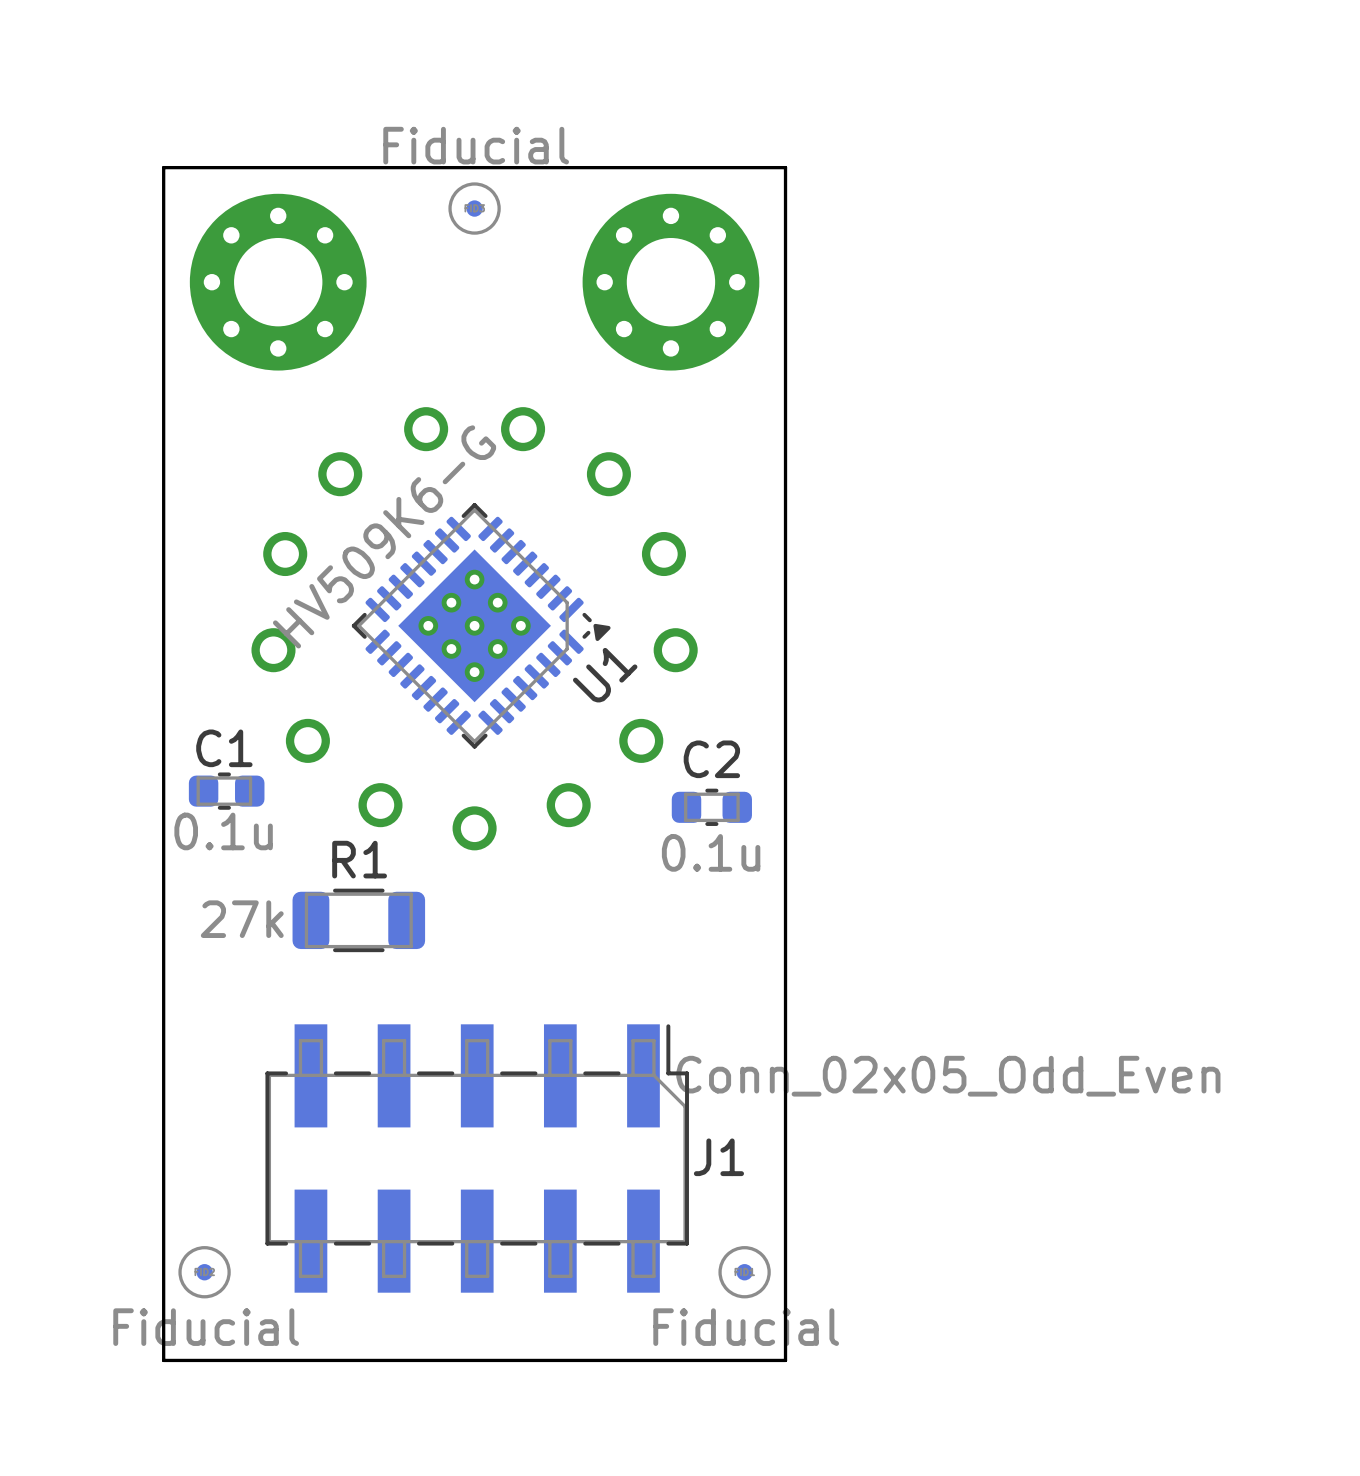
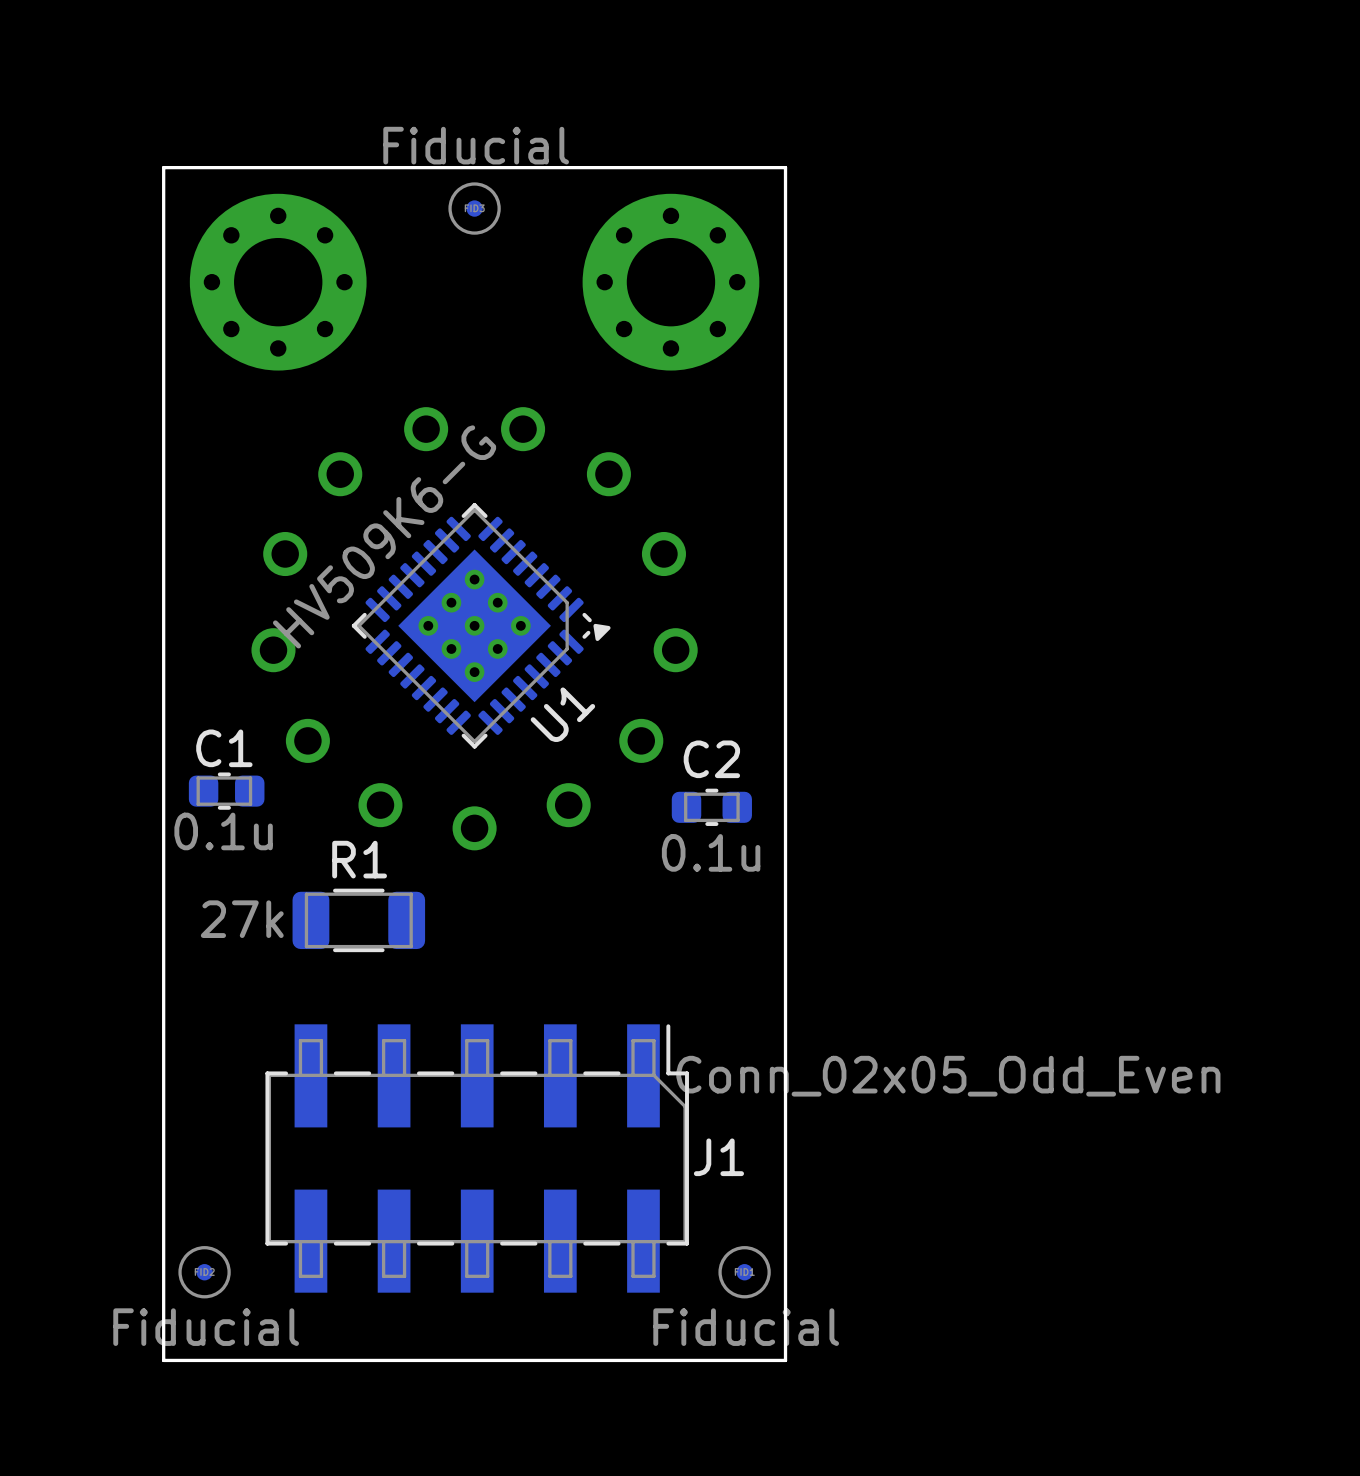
U1 name position: U1 (605, 675) -> U1 (562, 714)

